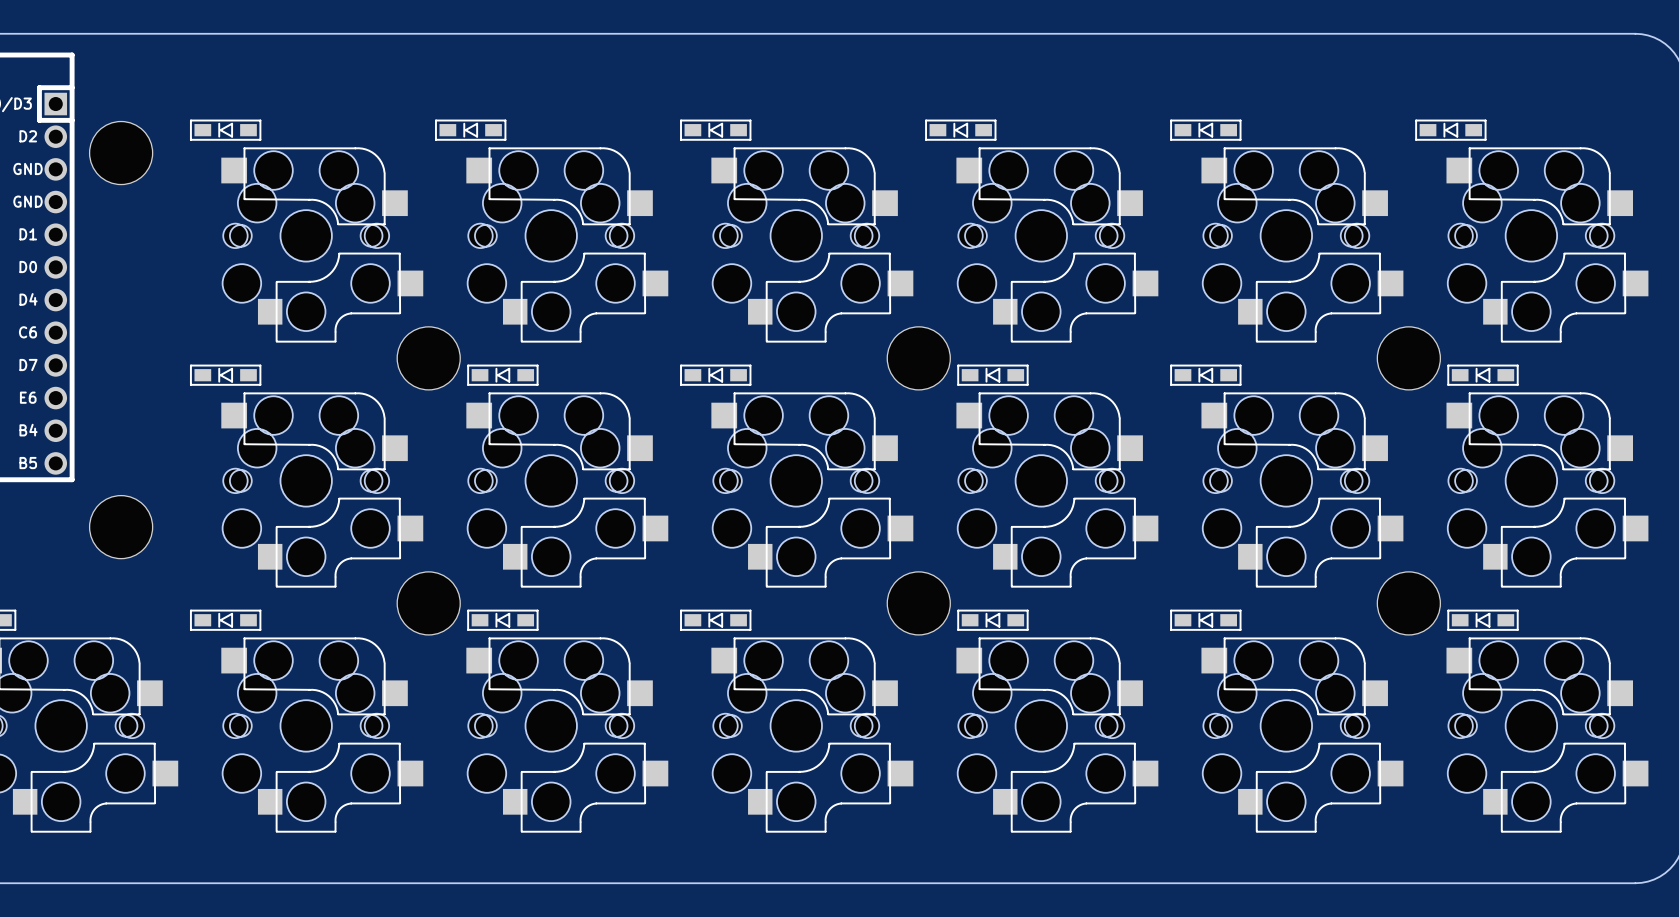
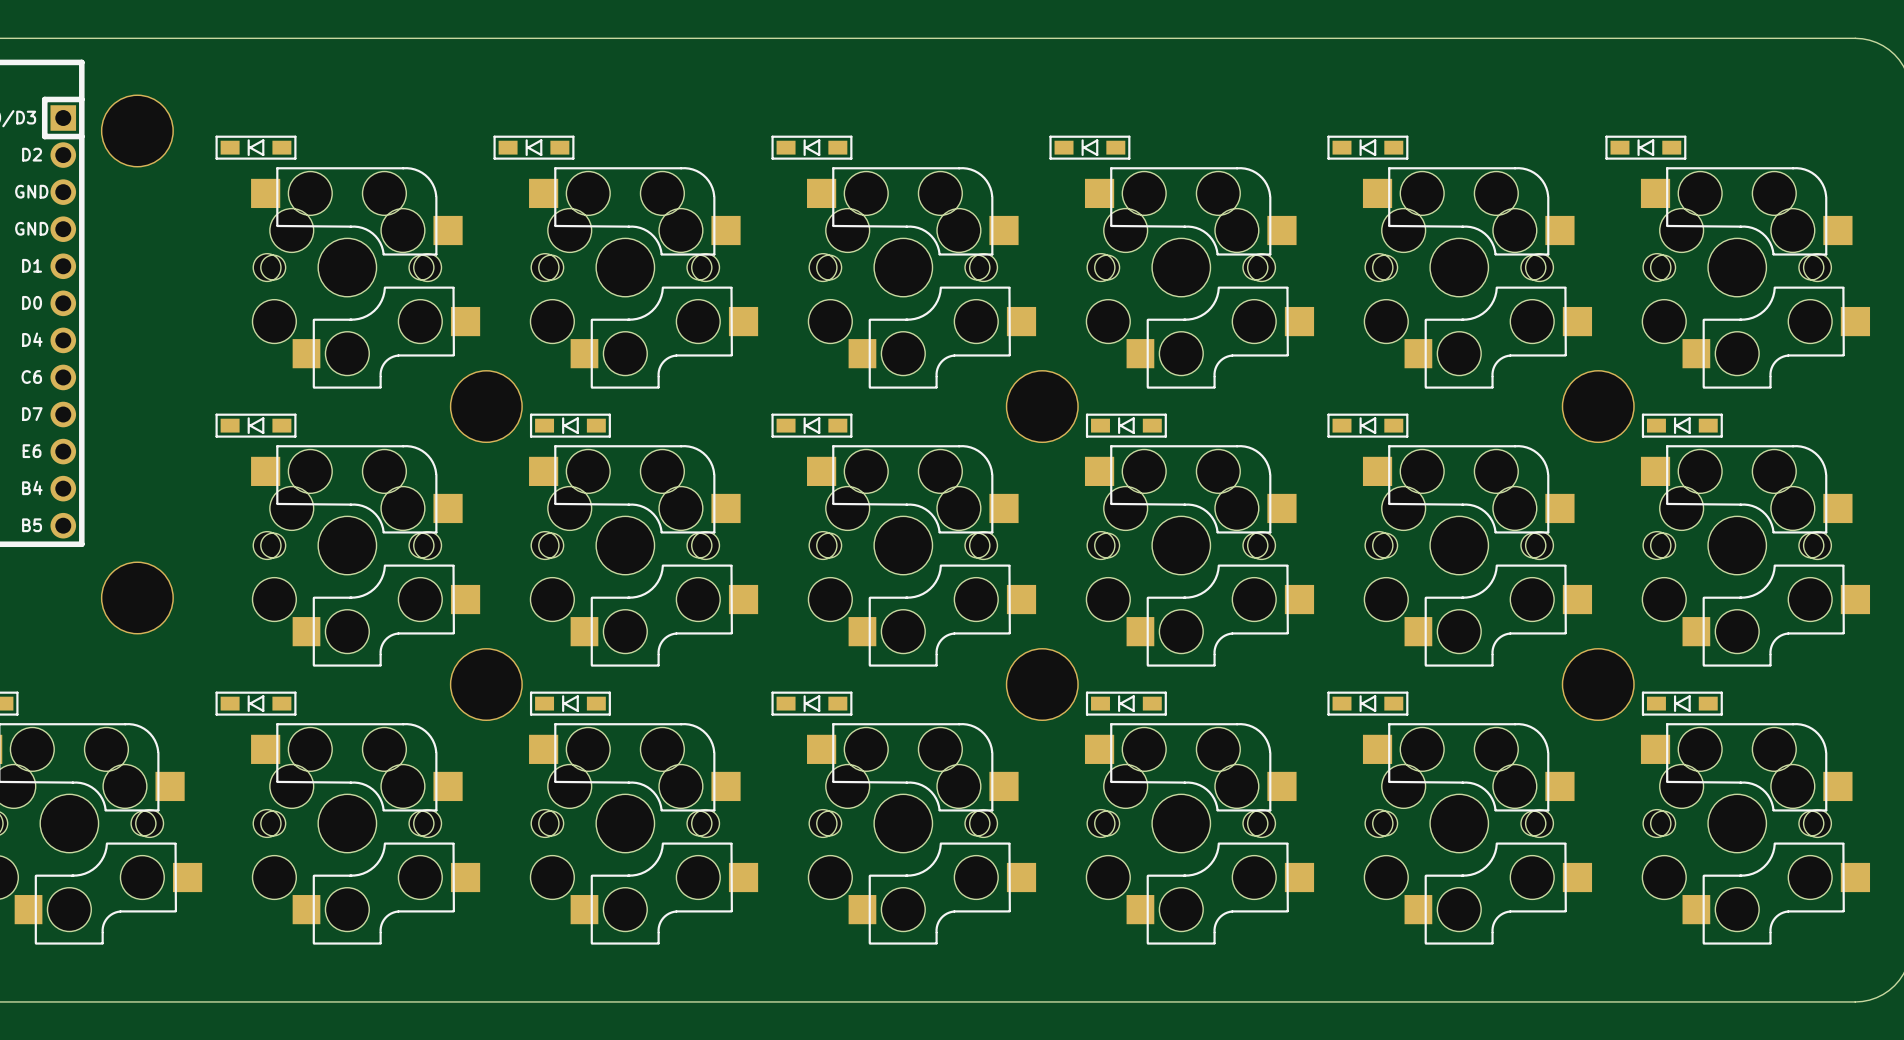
part position: (121, 153) -> (137, 130)

